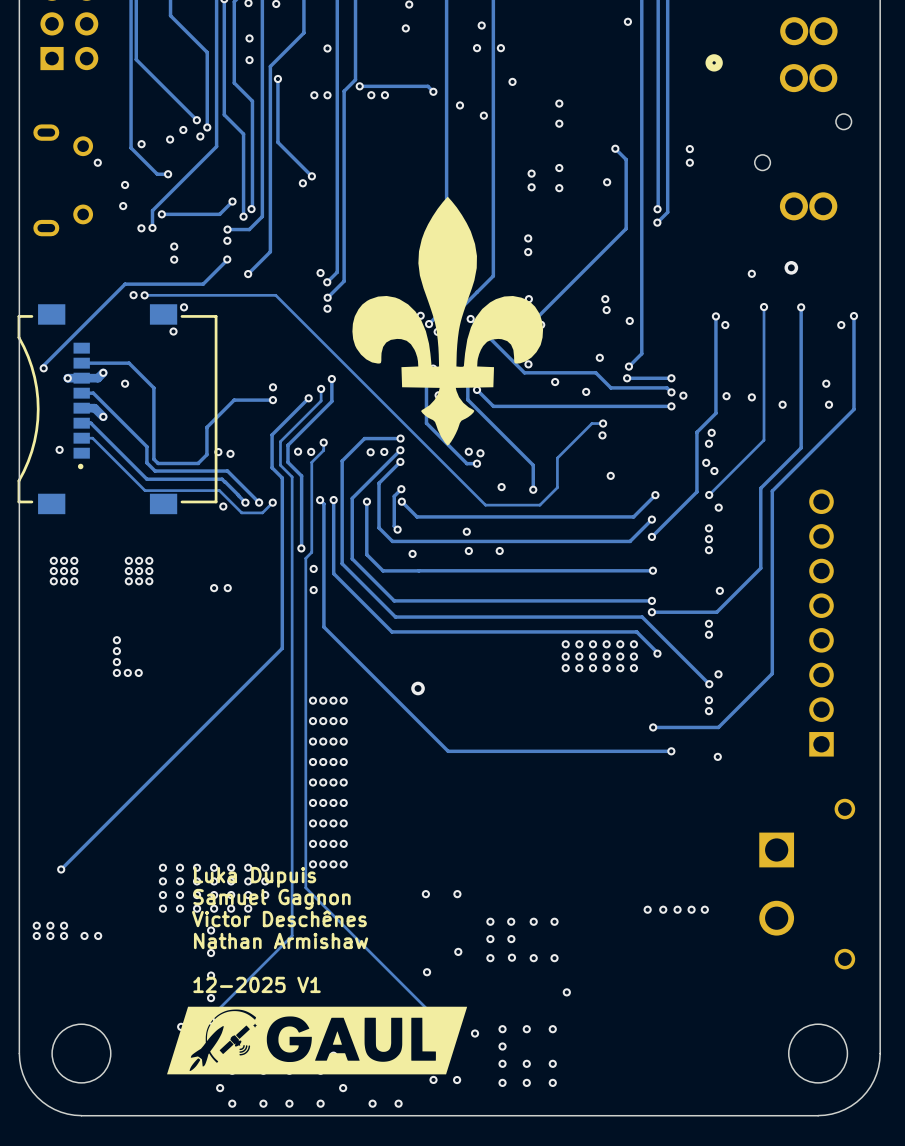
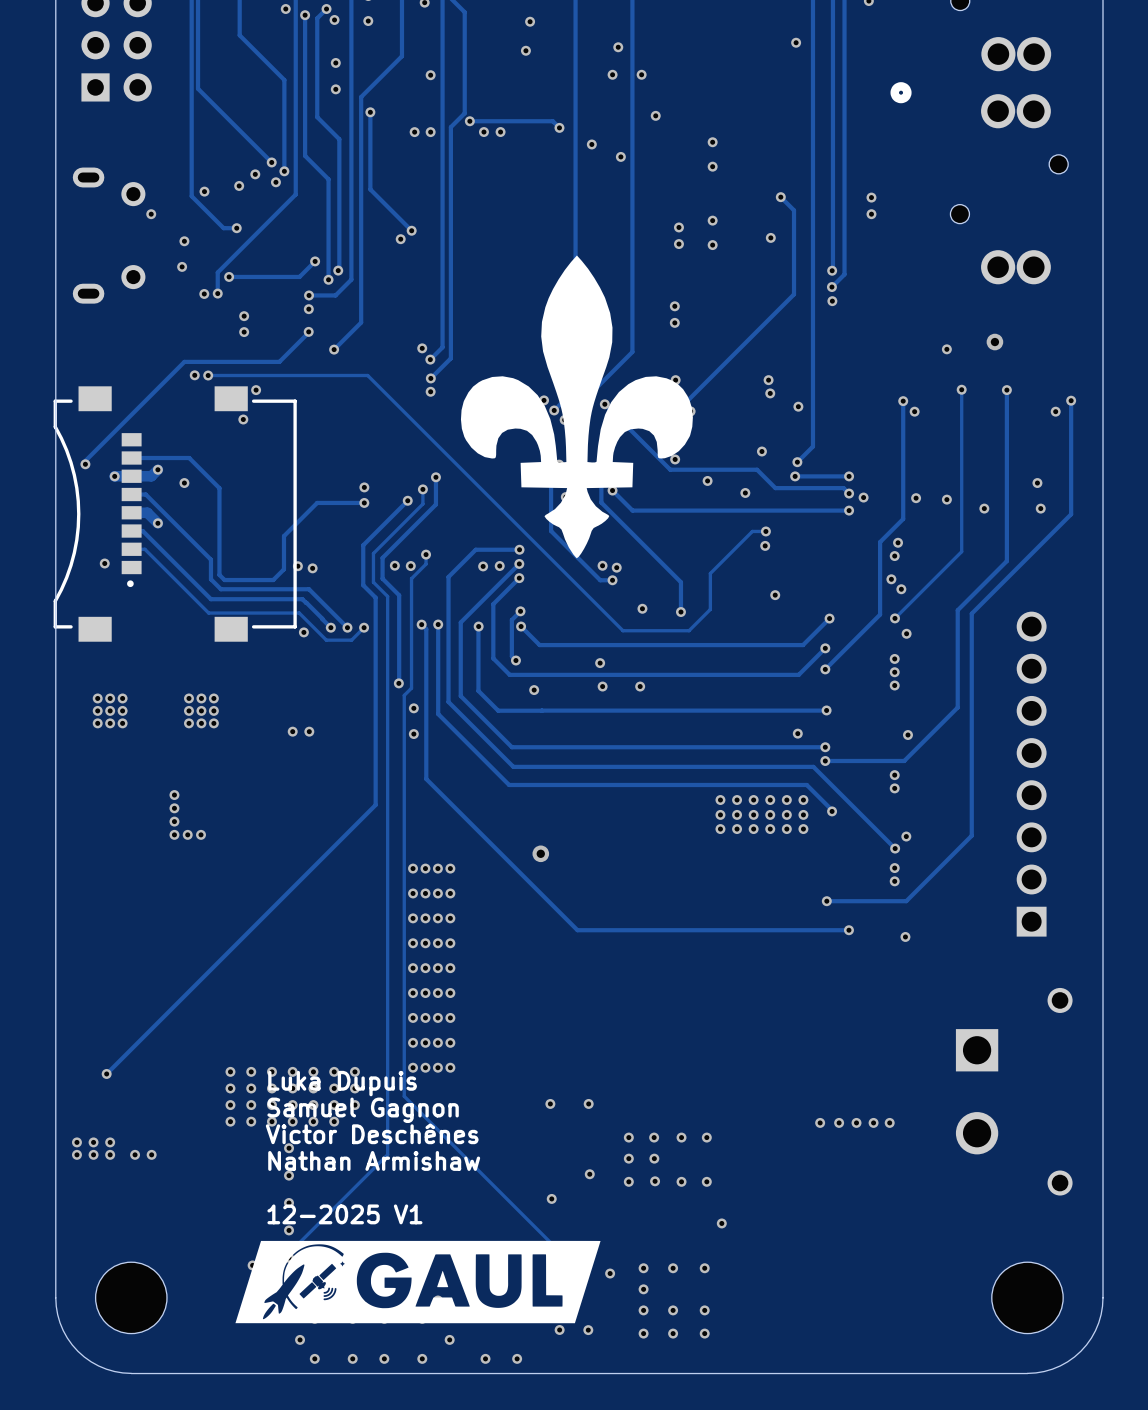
via: none -> (832, 301)
via: none -> (797, 733)

